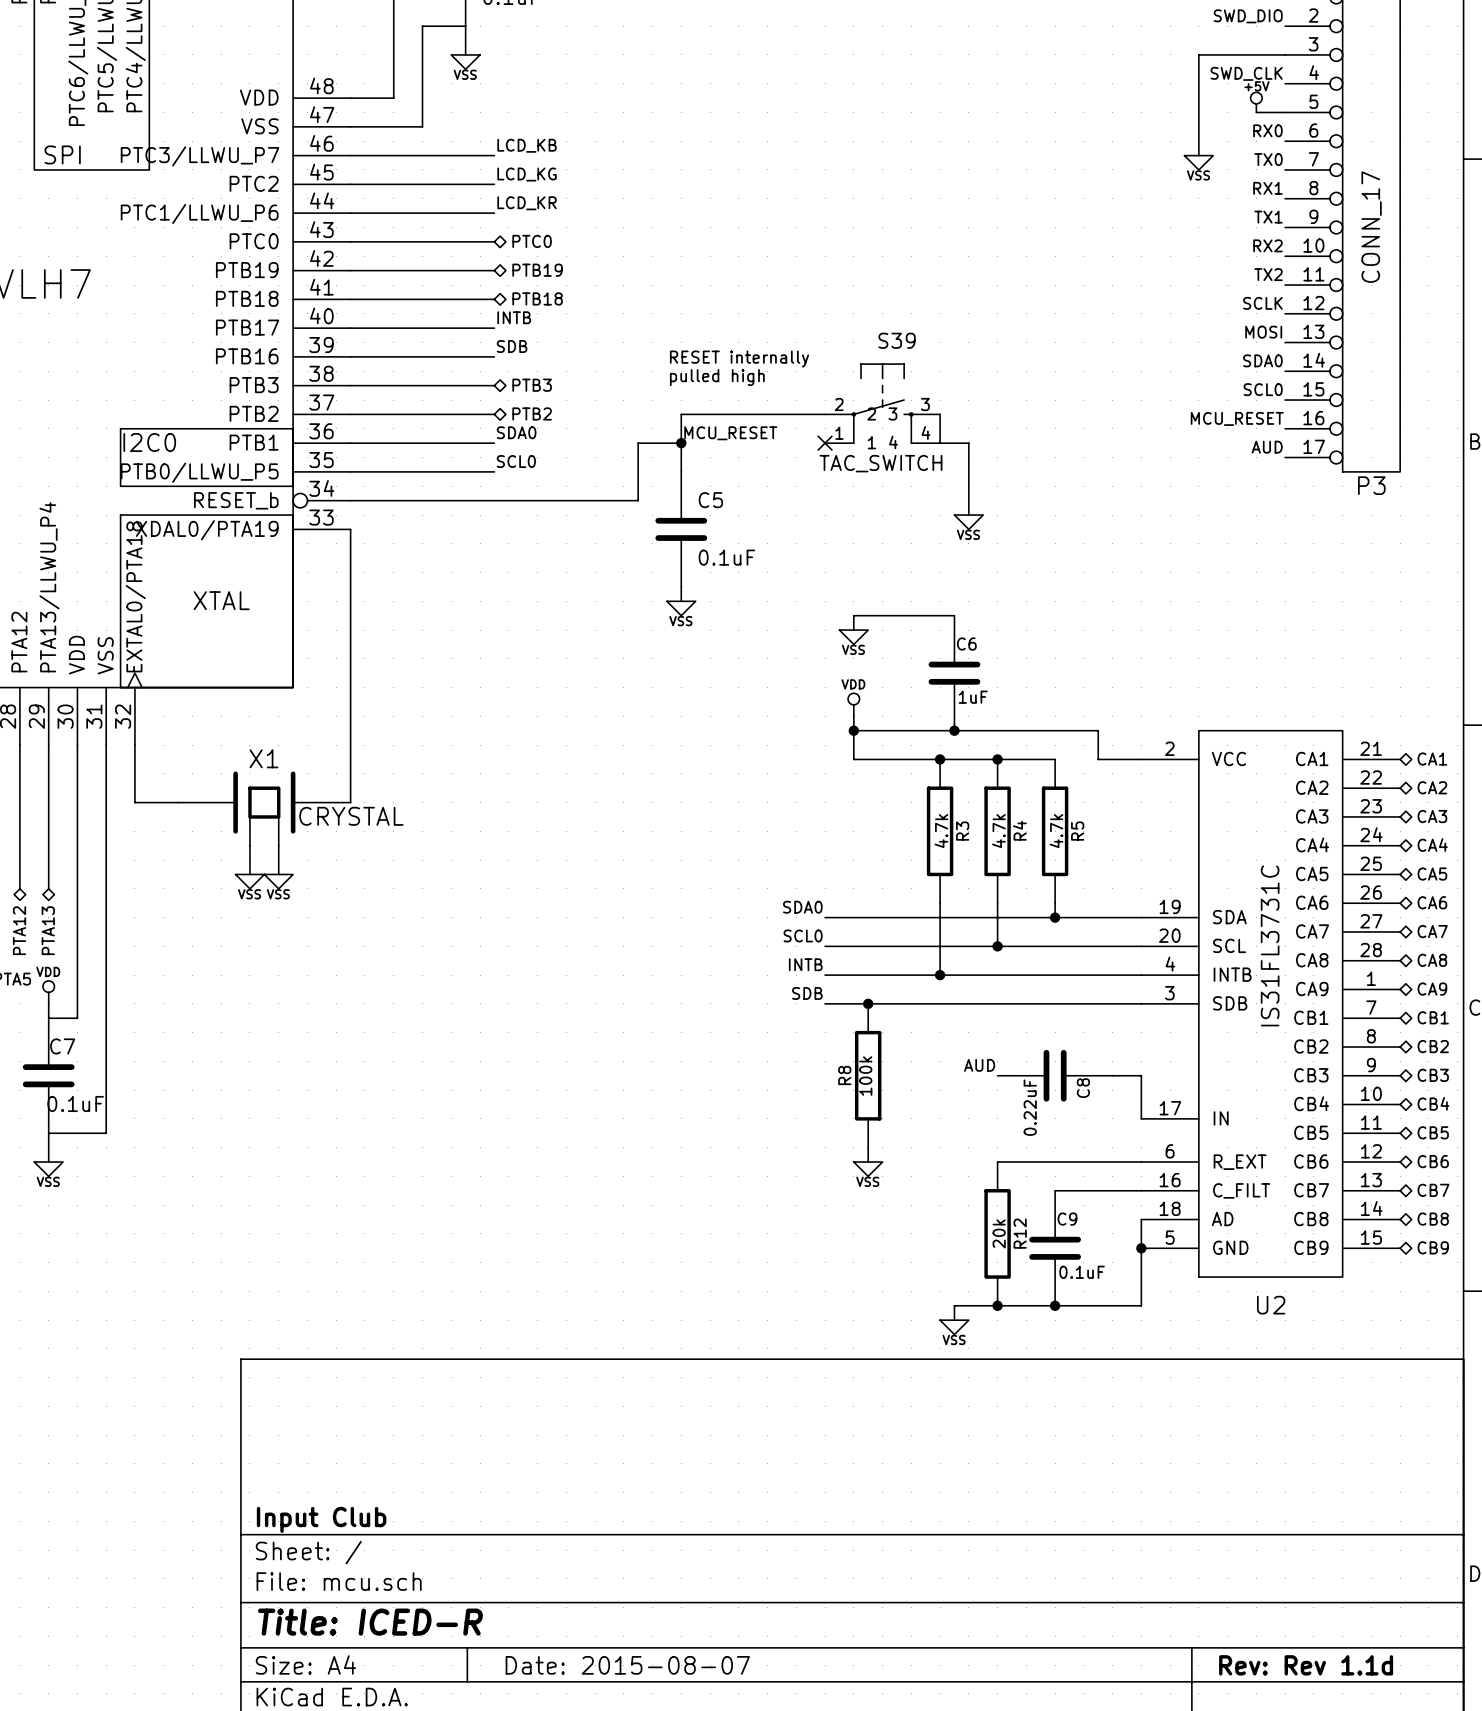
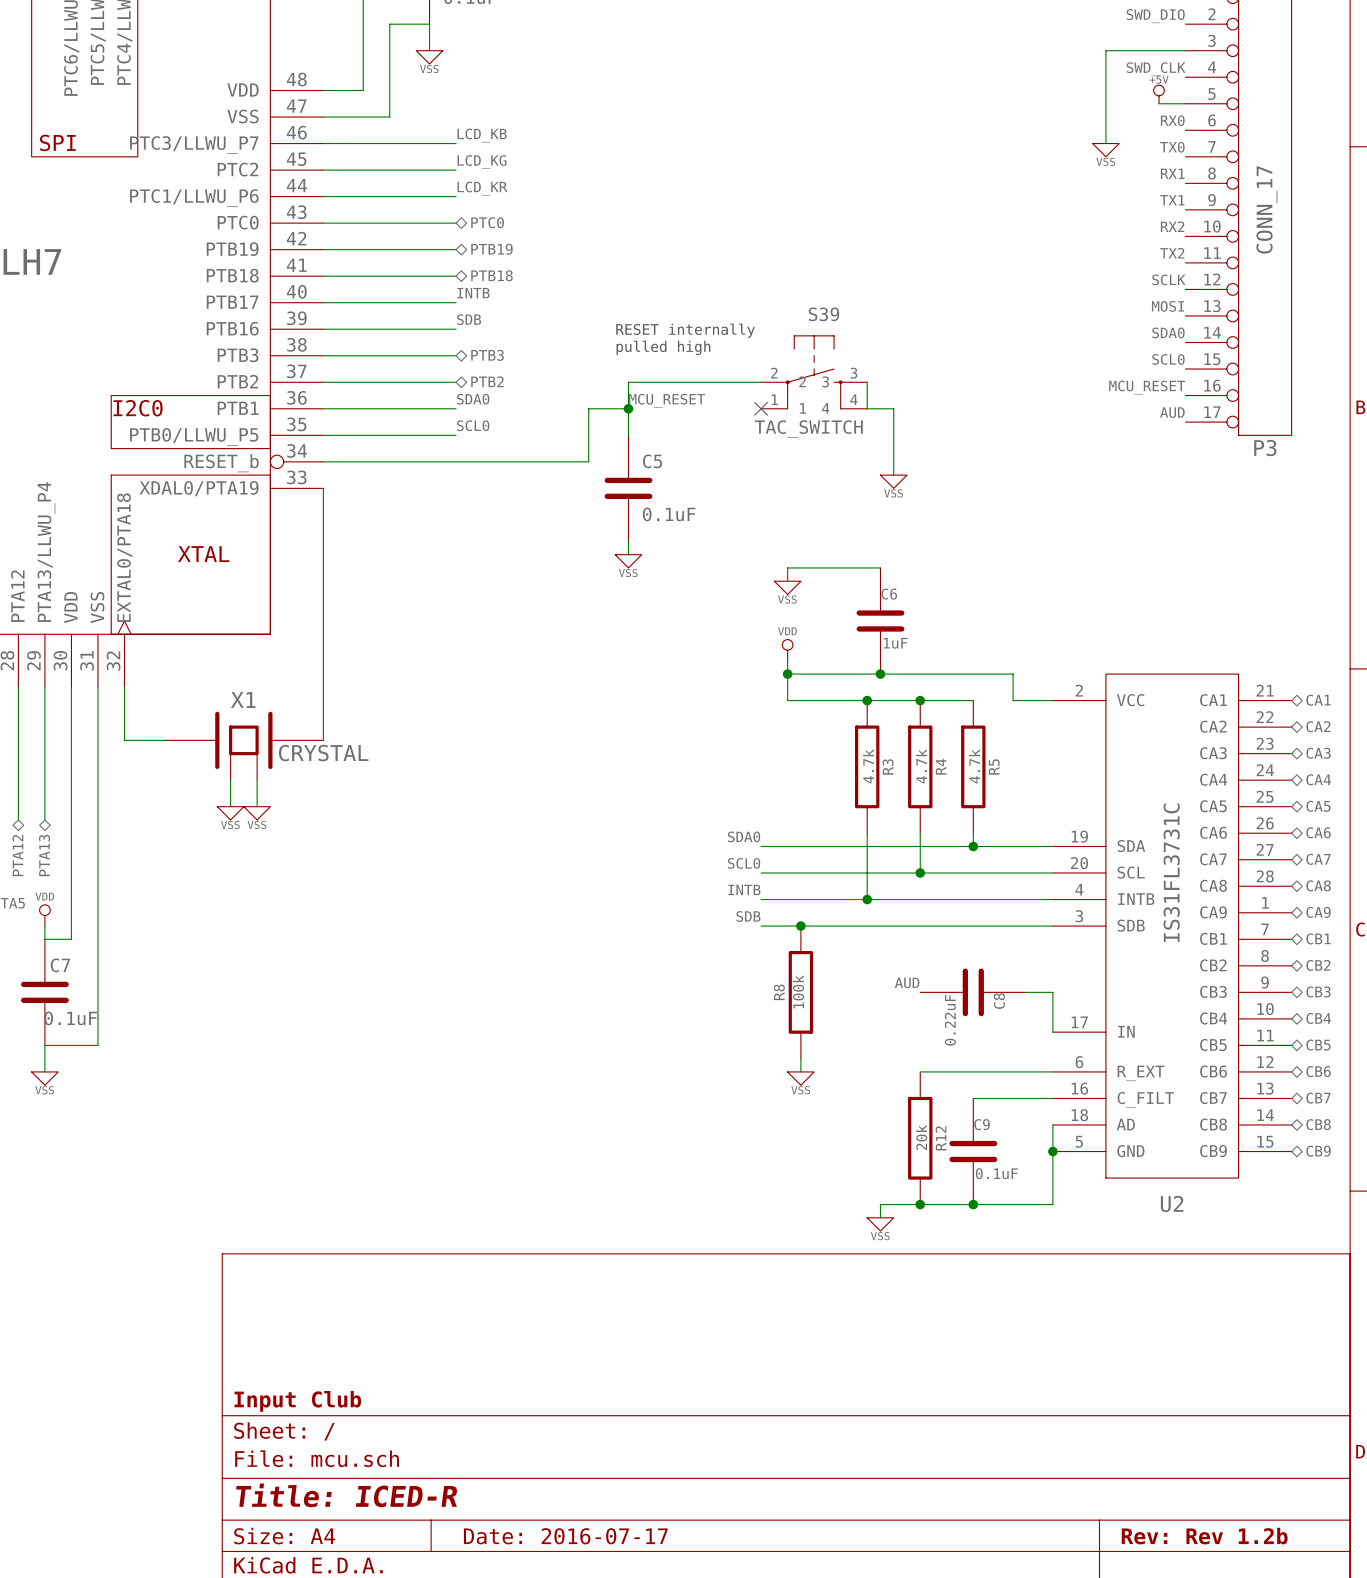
title block: Date: 2015-08-07 (627, 1665) -> Date: 2016-07-17 (565, 1536)
title block: Rev: Rev 1.1d (1306, 1665) -> Rev: Rev 1.2b (1204, 1536)

